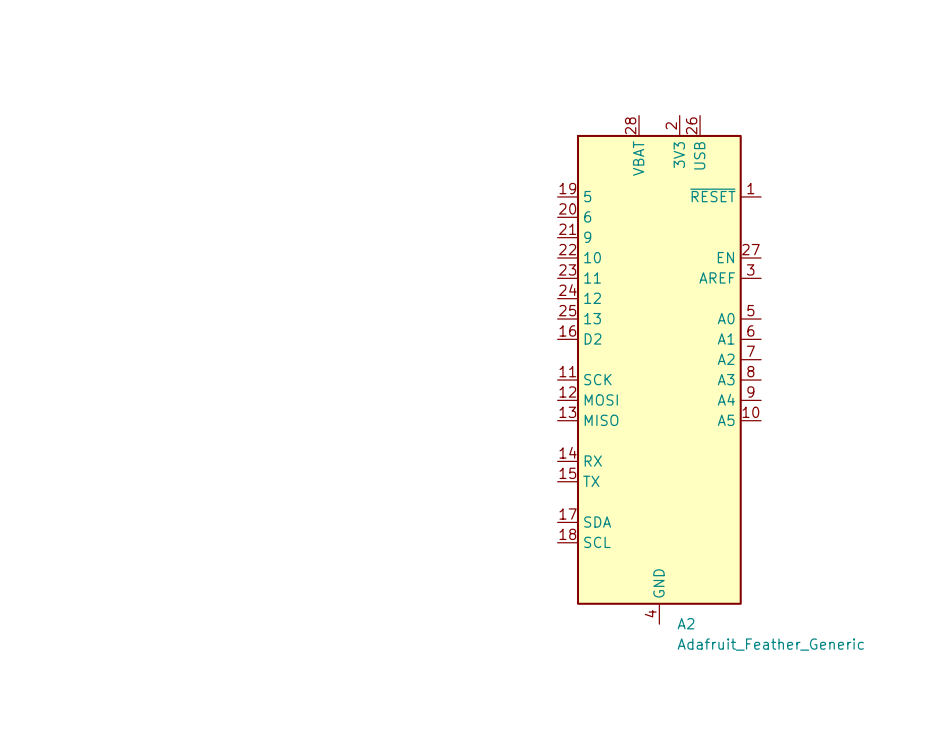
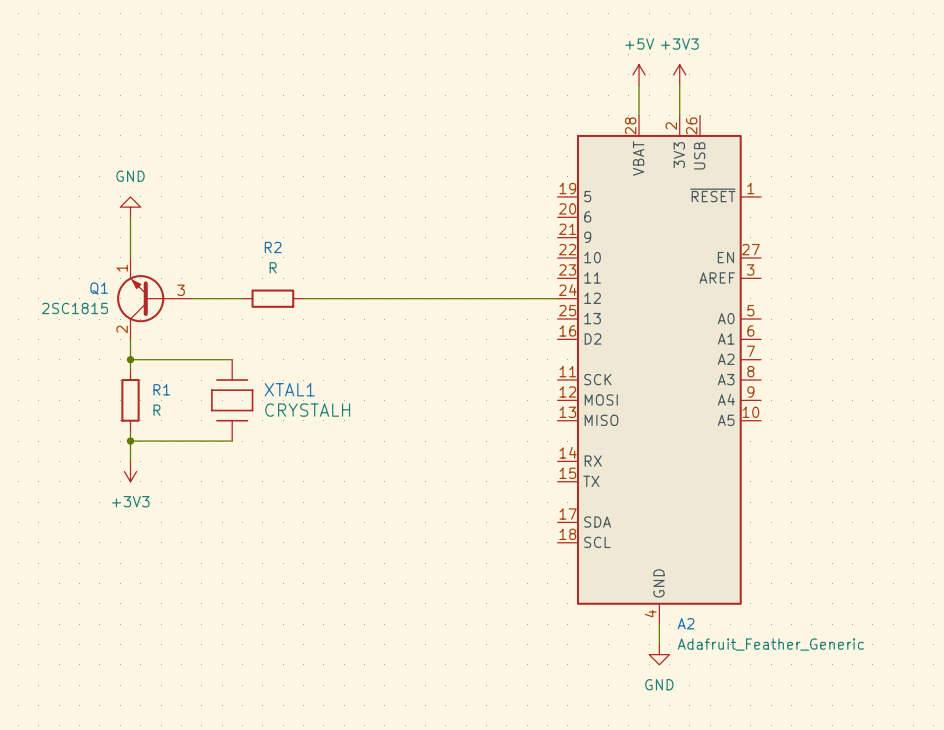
power symbol: none -> +5V (639, 74)
power symbol: none -> +3V3 (679, 74)
wire: none -> (639, 85) (639, 115)
wire: none -> (679, 85) (679, 115)
power symbol: none -> GND (130, 207)
wire: none -> (130, 217) (130, 257)
Q1: none -> 2SC1815 (154, 298)
wire: none -> (191, 298) (242, 298)
R2: none -> R (272, 298)
wire: none -> (303, 298) (557, 298)
wire: none -> (130, 339) (130, 369)
wire: none -> (130, 359) (232, 359)
junction: none -> (130, 359)
R1: none -> R (130, 400)
XTAL1: none -> CRYSTALH (232, 400)
wire: none -> (130, 430) (130, 461)
wire: none -> (130, 441) (232, 441)
junction: none -> (130, 441)
power symbol: none -> +3V3 (130, 471)
wire: none -> (659, 624) (659, 644)
power symbol: none -> GND (659, 654)

